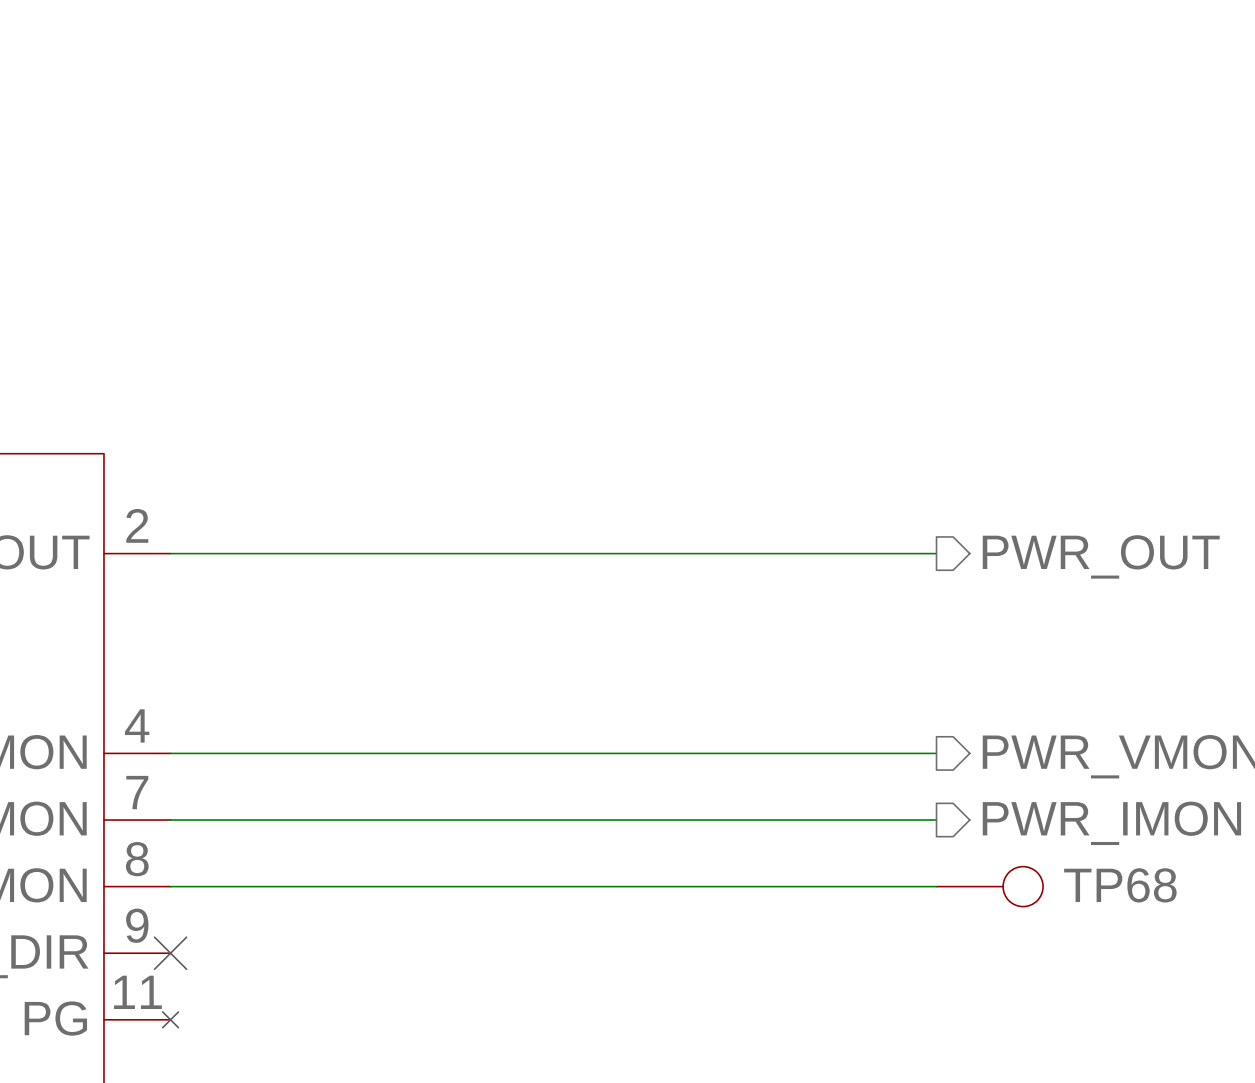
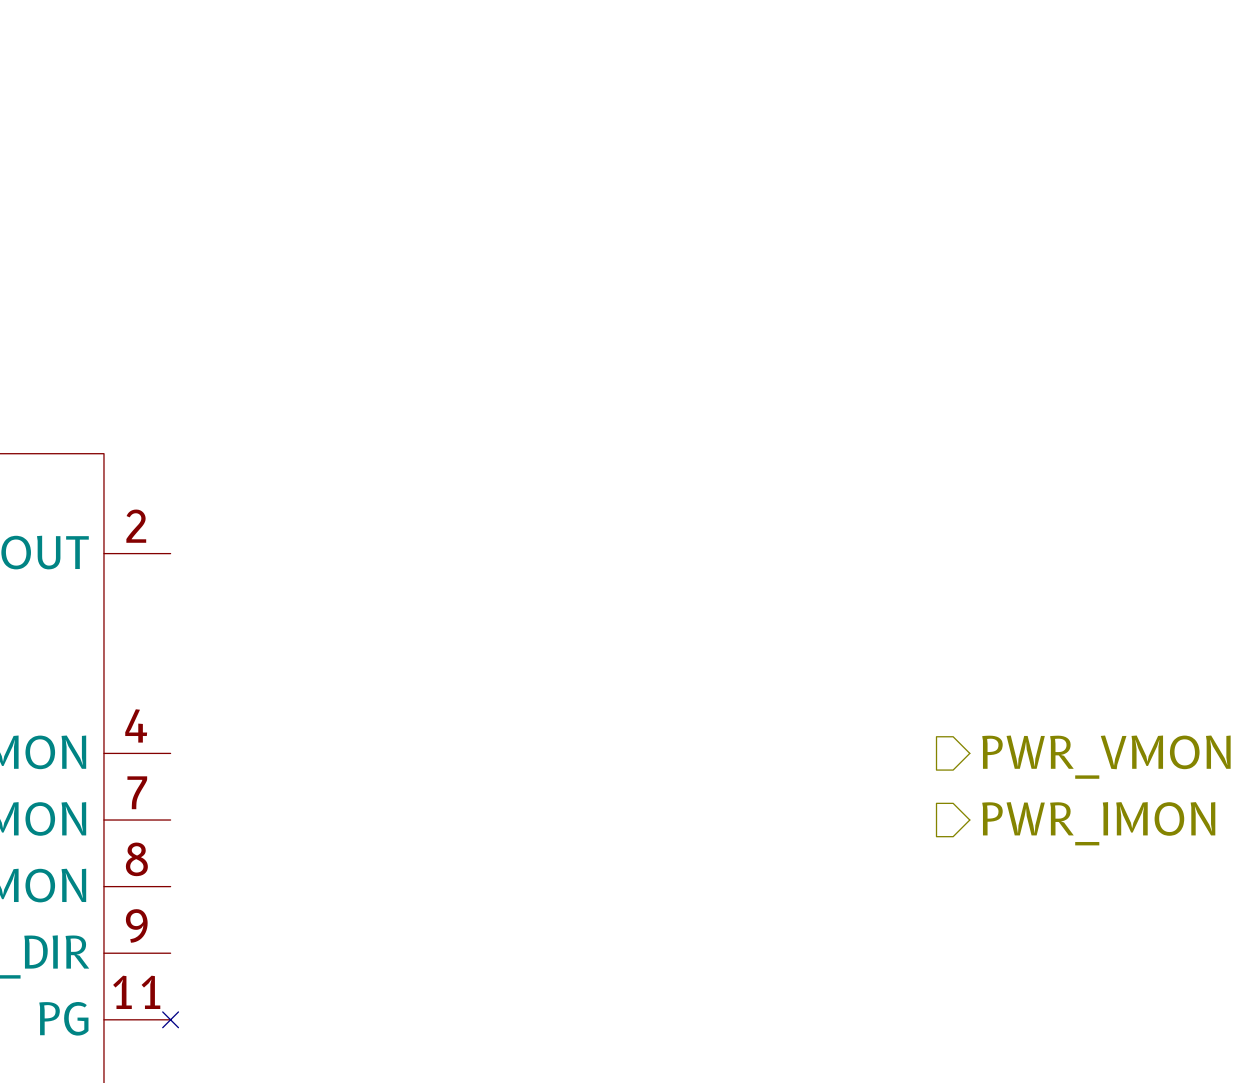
wire: (170, 553) (936, 553) -> none
hierarchical label: PWR_OUT (1101, 556) -> none
wire: (170, 753) (936, 753) -> none
wire: (170, 820) (936, 820) -> none
wire: (170, 886) (936, 886) -> none
TP68: (989, 886) -> none
no-connect mark: (170, 953) -> none

